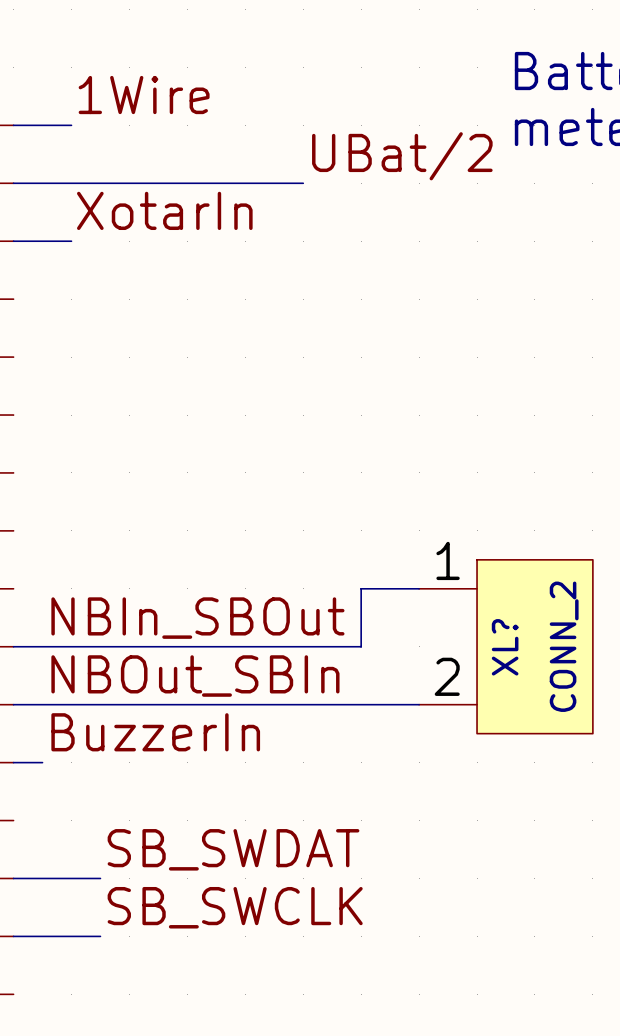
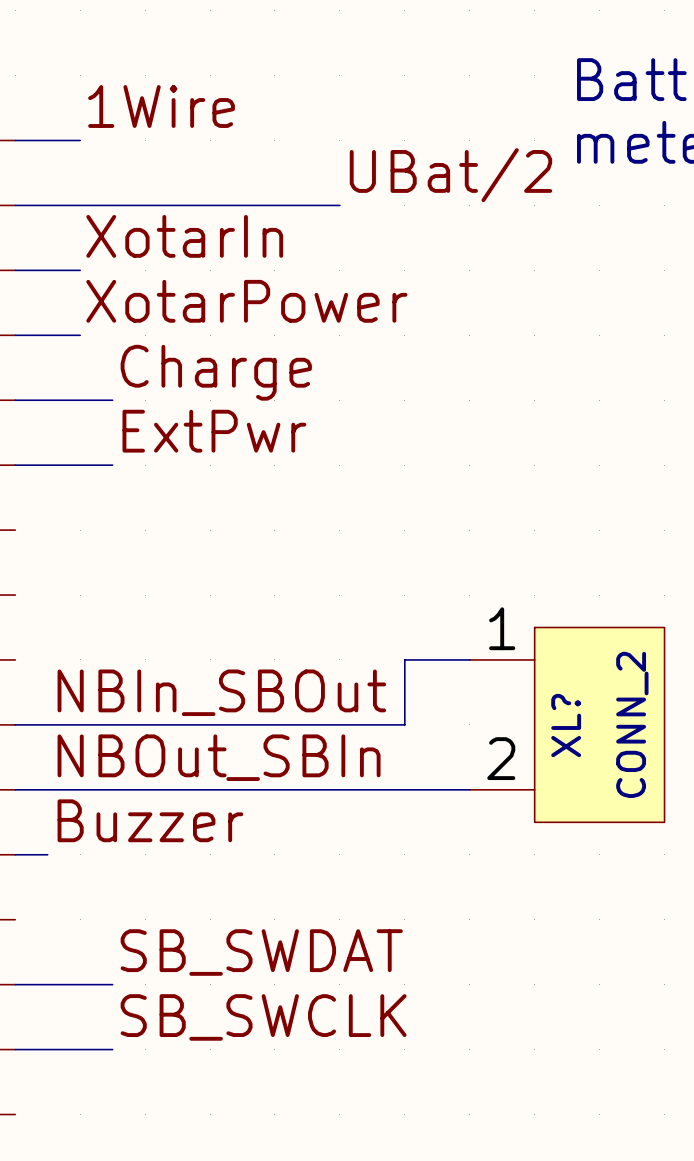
label: none -> XotarPower (246, 301)
wire: none -> (15, 335) (80, 335)
label: none -> Charge (216, 372)
wire: none -> (15, 400) (112, 400)
label: none -> ExtPwr (214, 431)
wire: none -> (15, 465) (112, 465)
label: BuzzerIn (155, 732) -> Buzzer (150, 820)

